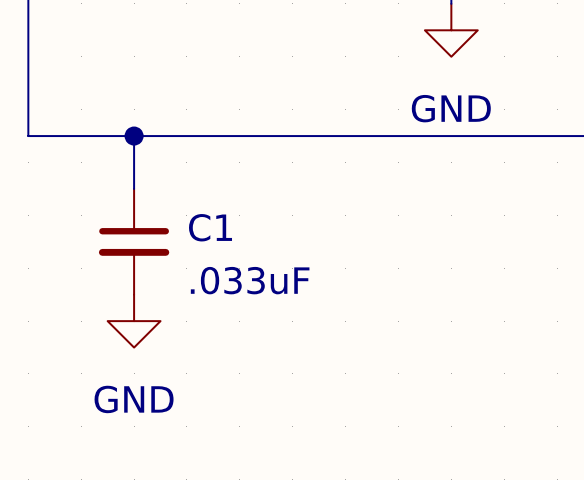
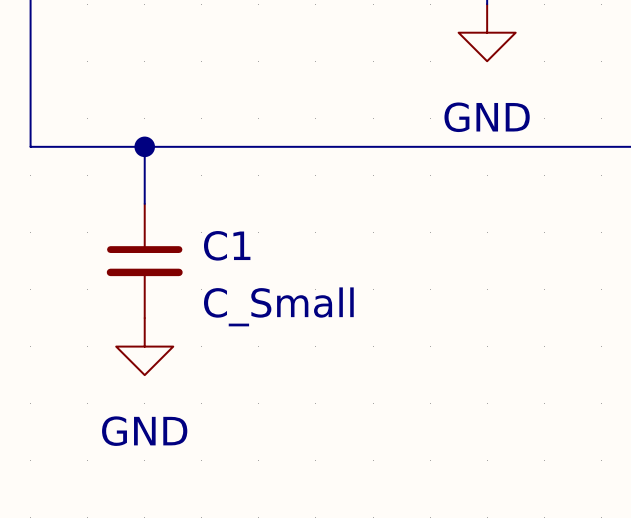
C1 value: .033uF (250, 280) -> C_Small (278, 306)

